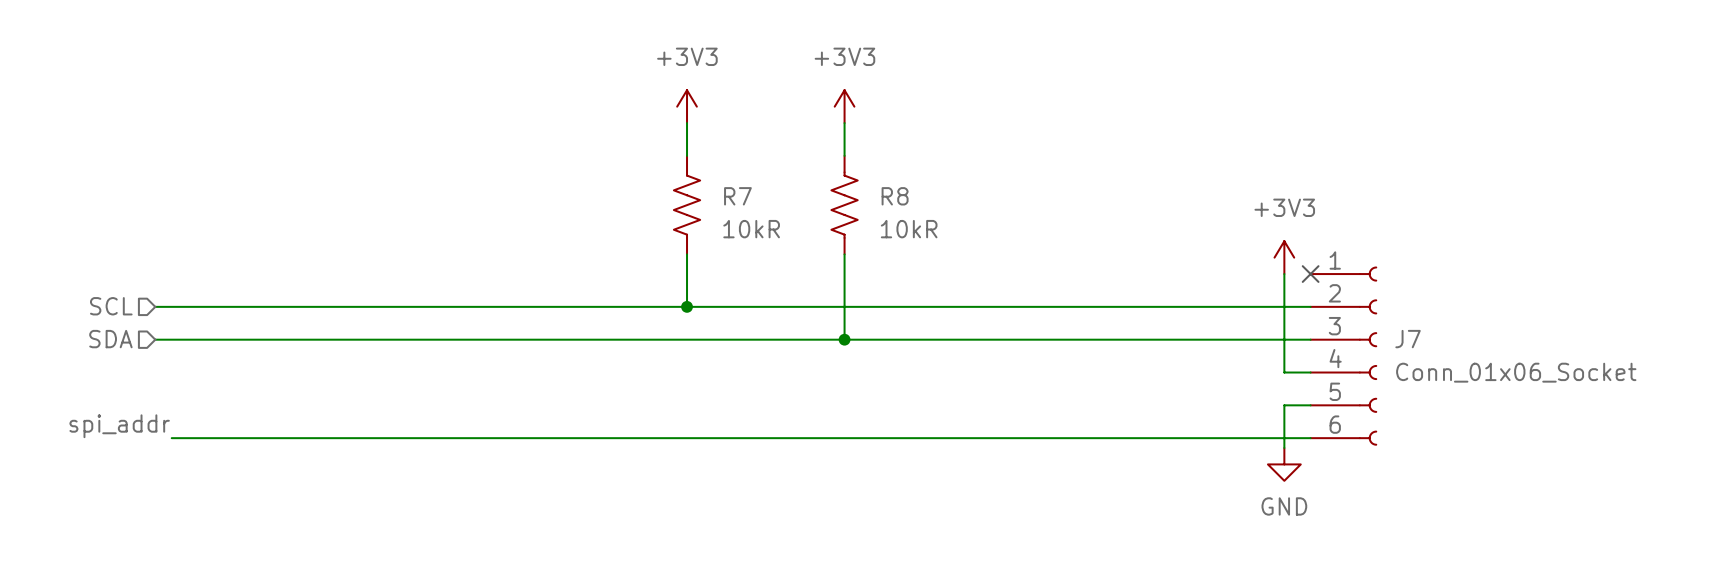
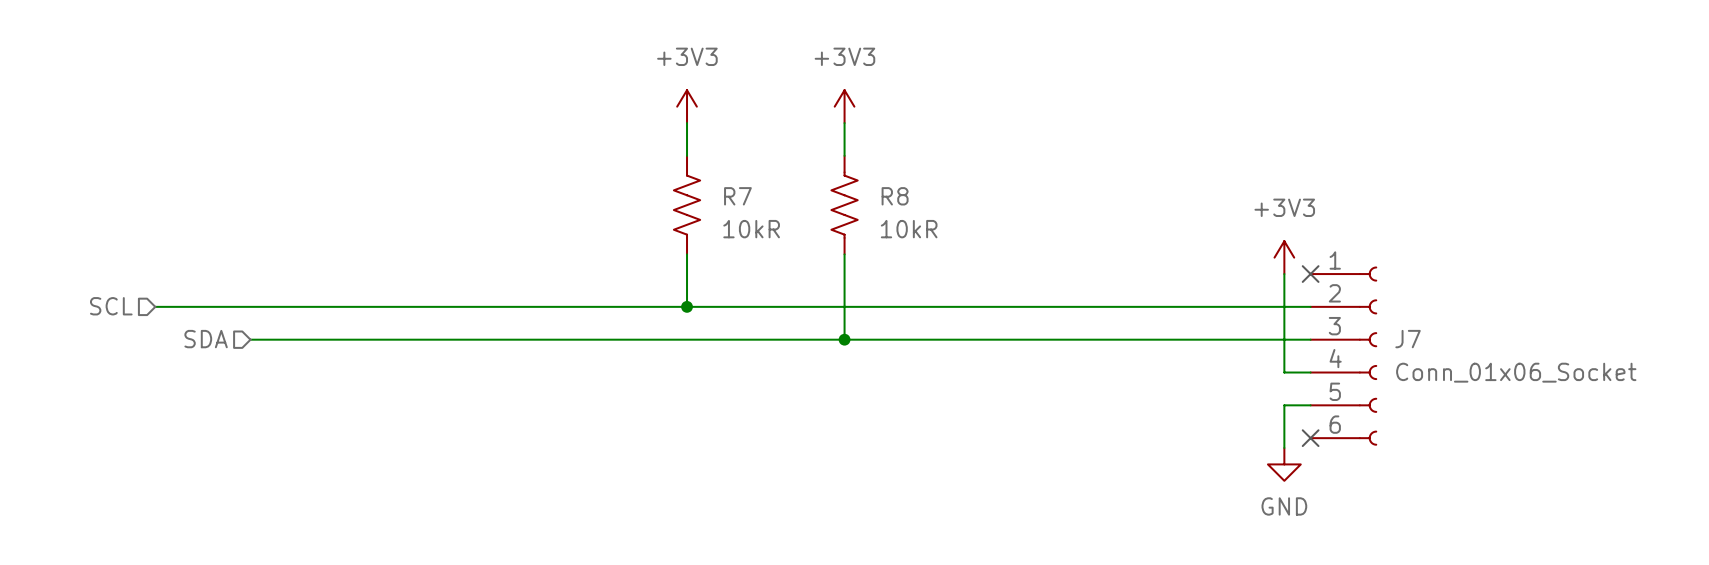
hierarchical label position: SDA (110, 339) -> SDA (206, 339)
wire: (155, 339) (250, 339) -> none
label: spi_addr (119, 426) -> none
wire: (171, 438) (1310, 438) -> none
no-connect mark: none -> (1310, 438)

